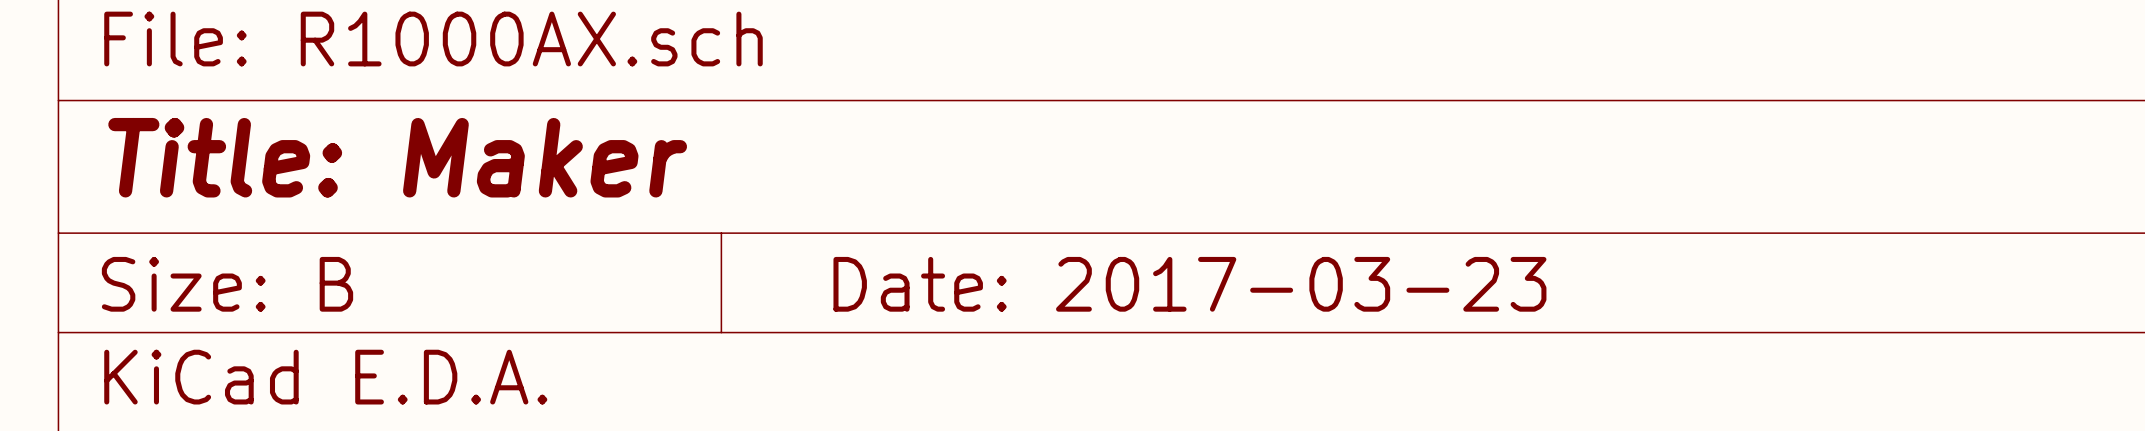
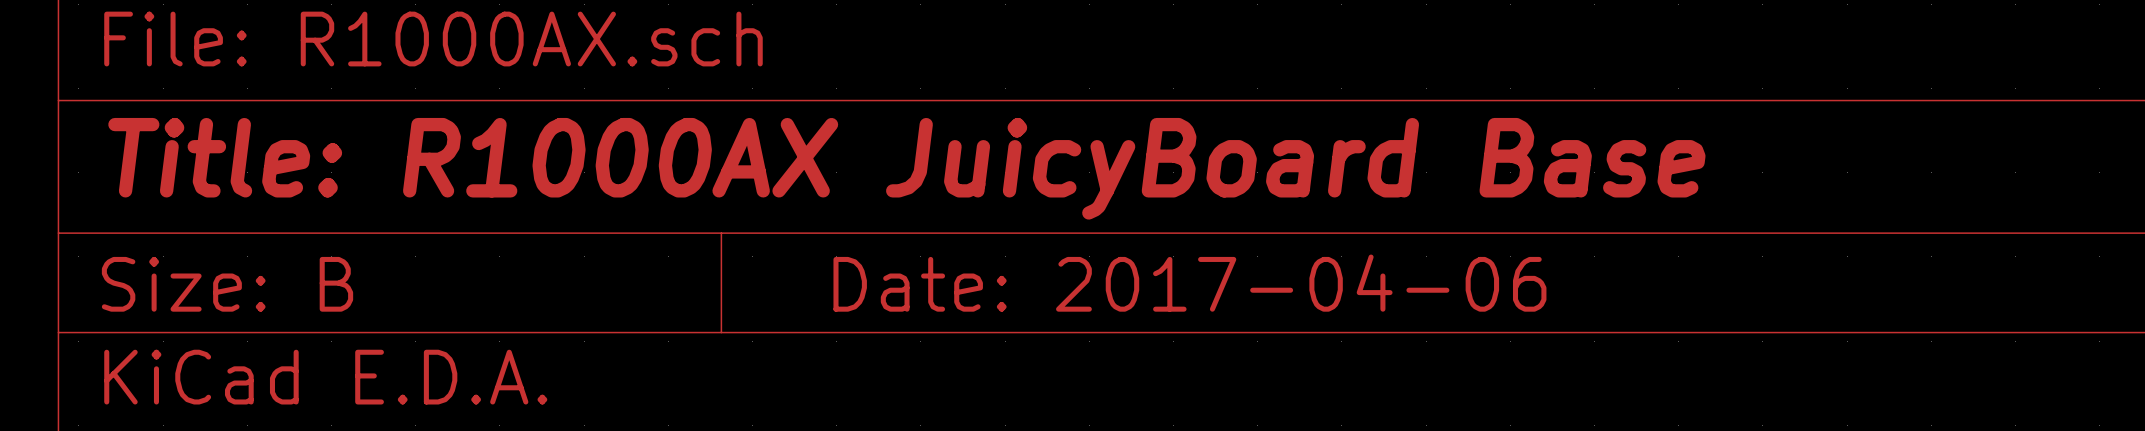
title block: Title: Maker (397, 157) -> Title: R1000AX JuicyBoard Base (906, 168)
title block: Date: 2017-03-23 (1189, 284) -> Date: 2017-04-06 (1189, 283)

